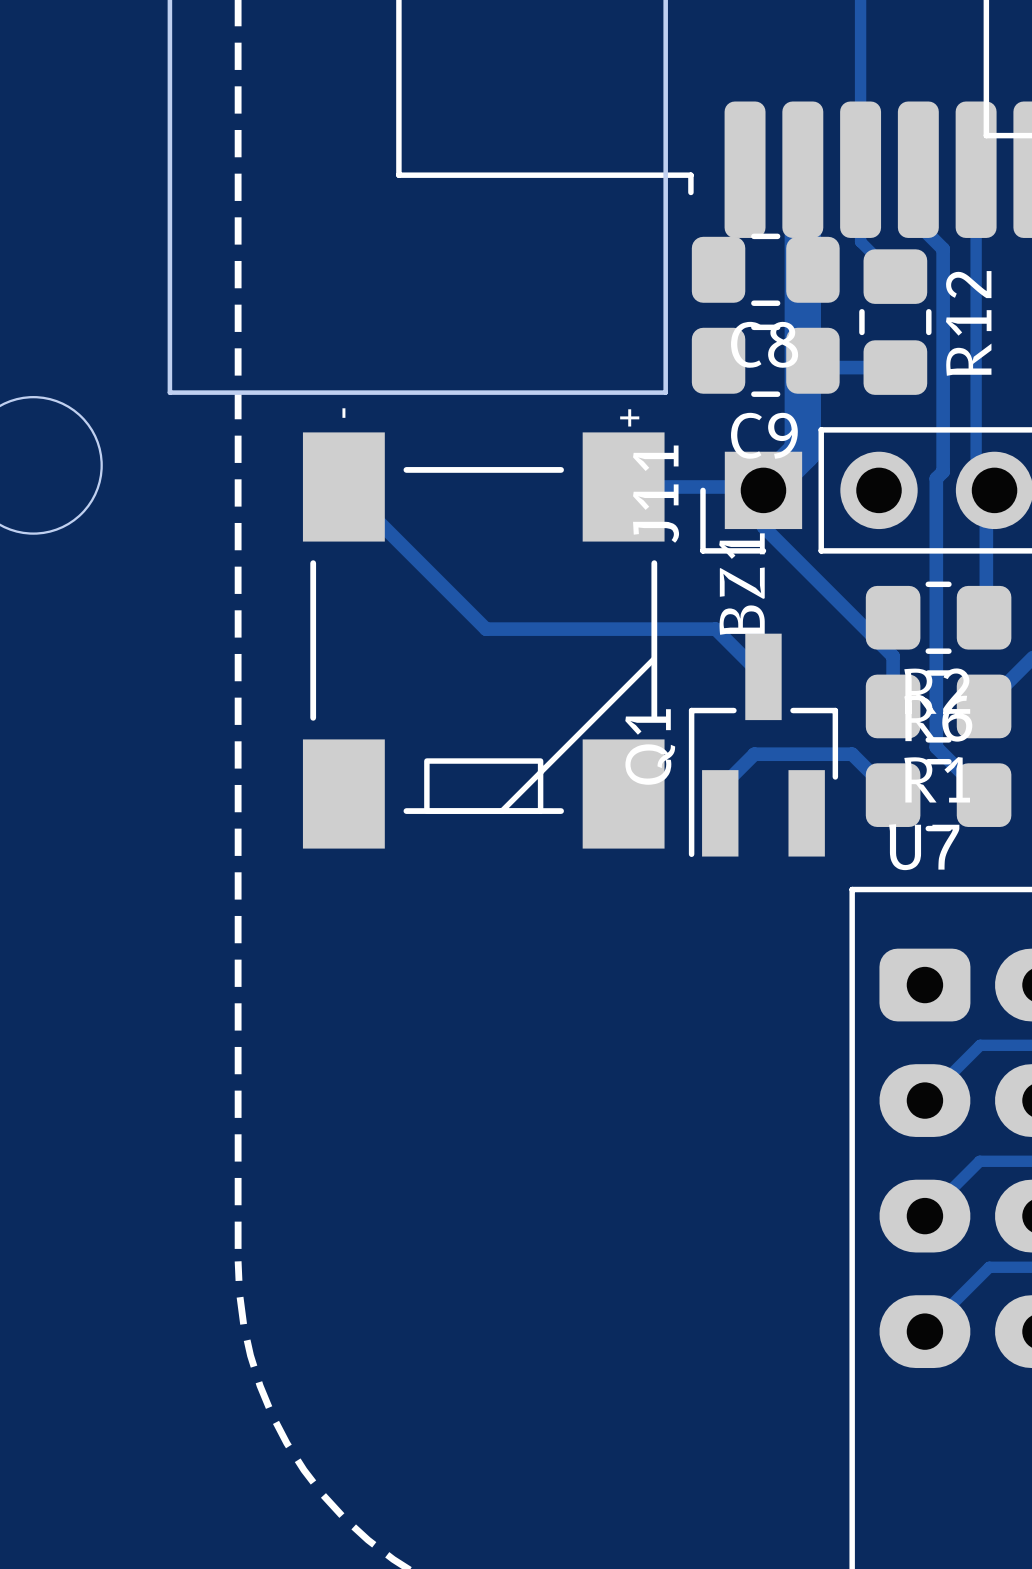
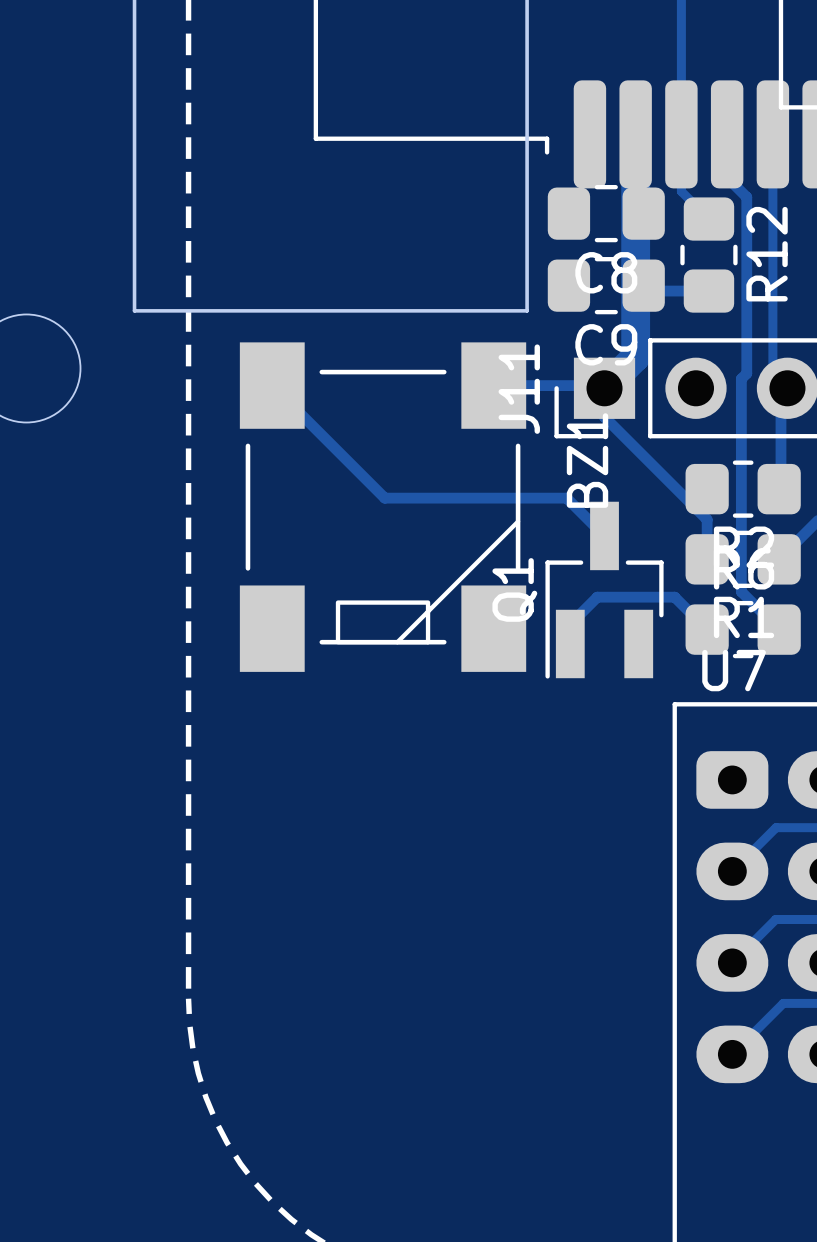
BZ1 text: - (343, 413) -> none
BZ1 text: + (629, 417) -> none

